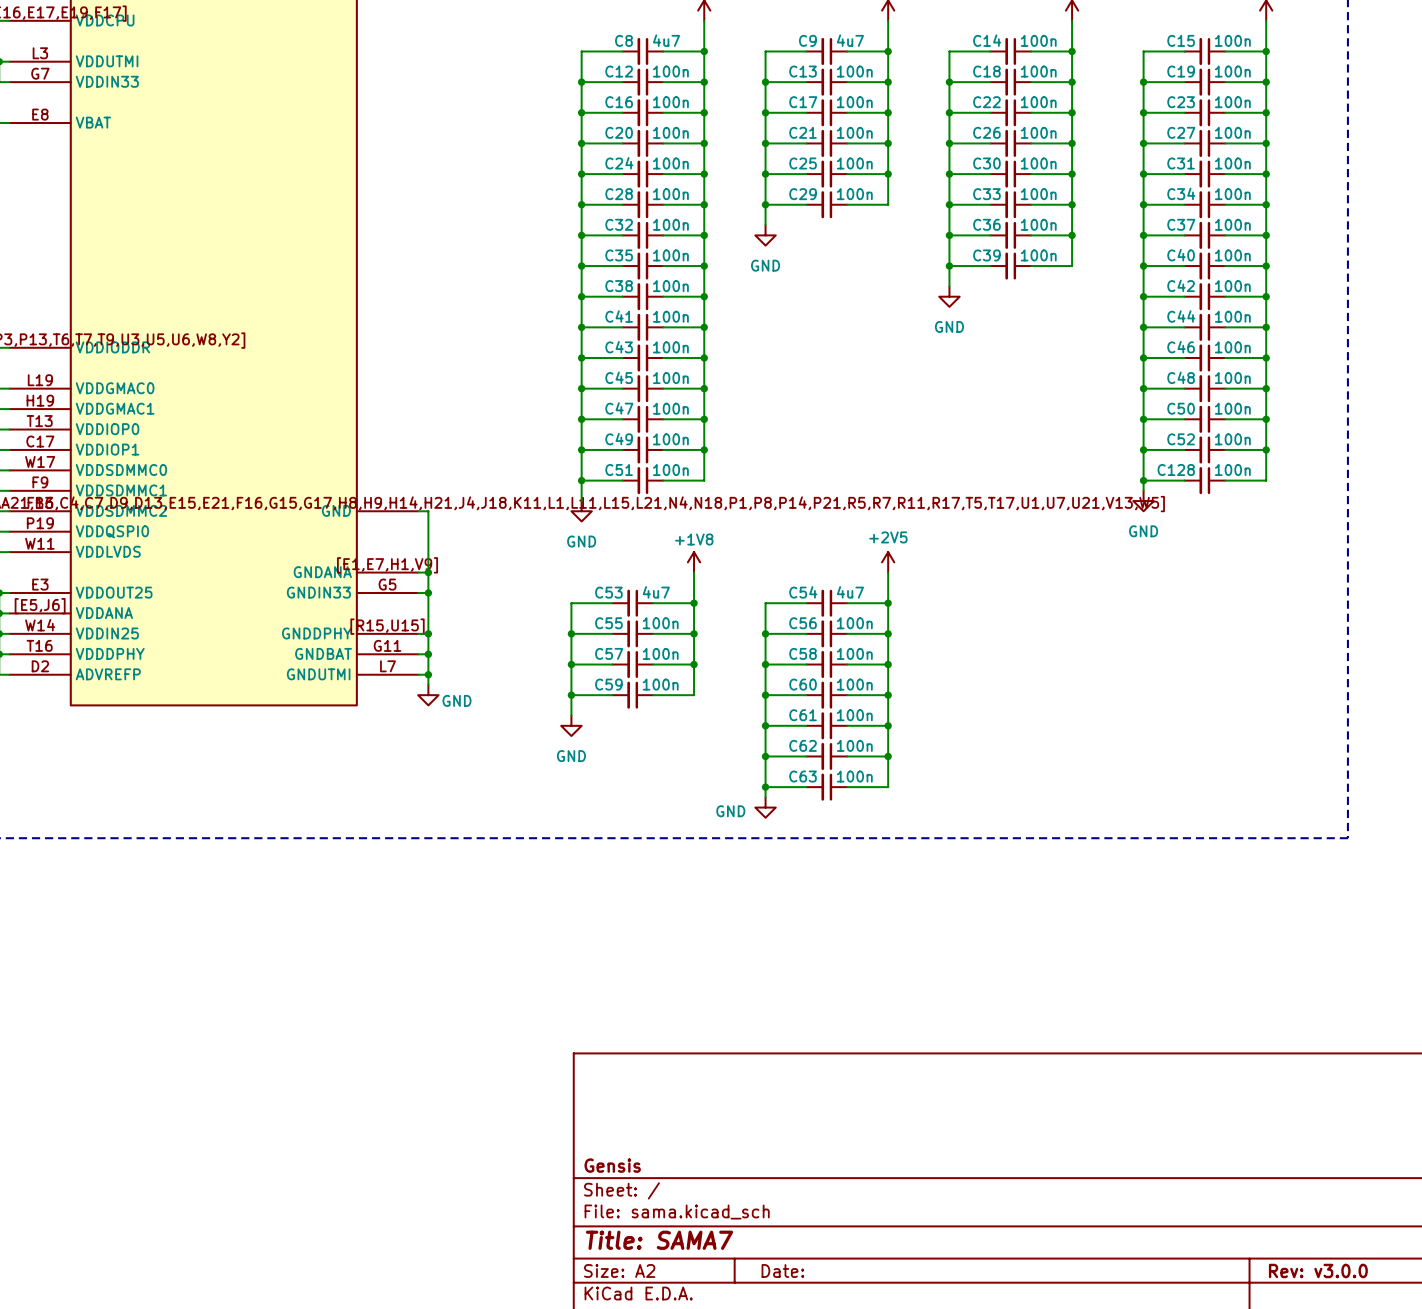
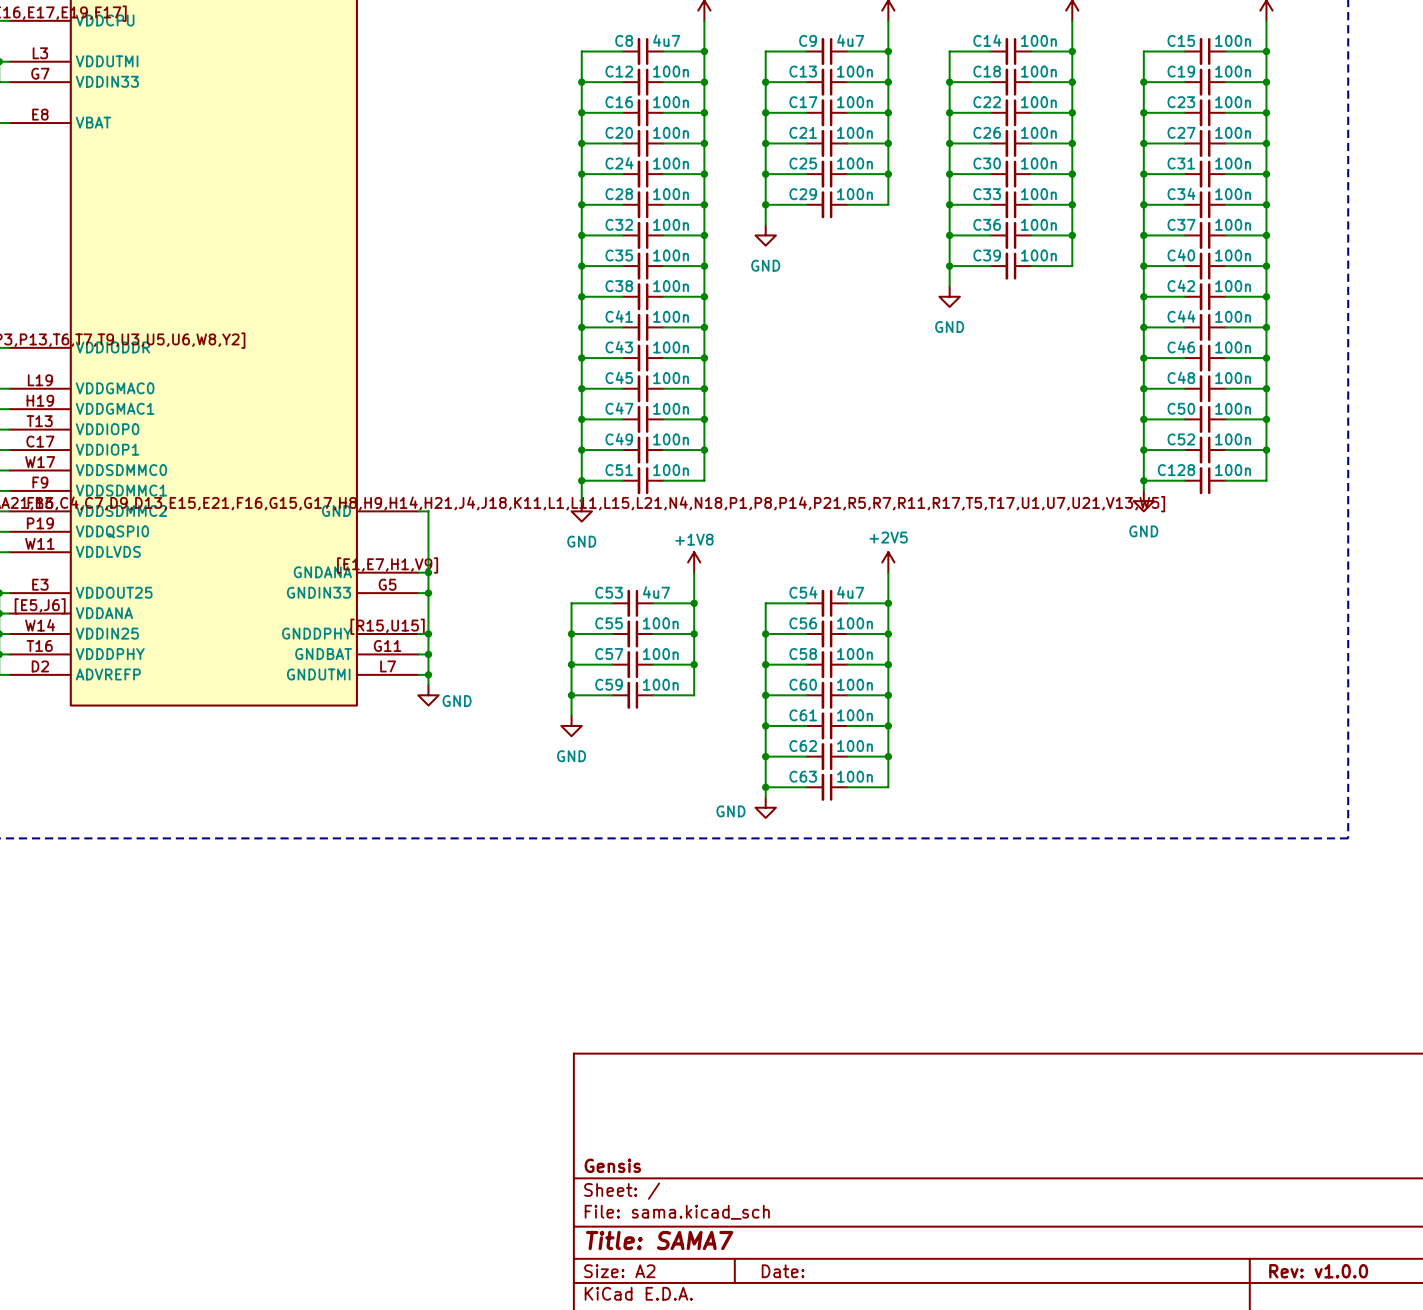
title block: Rev: v3.0.0 (1318, 1270) -> Rev: v1.0.0 (1318, 1271)

